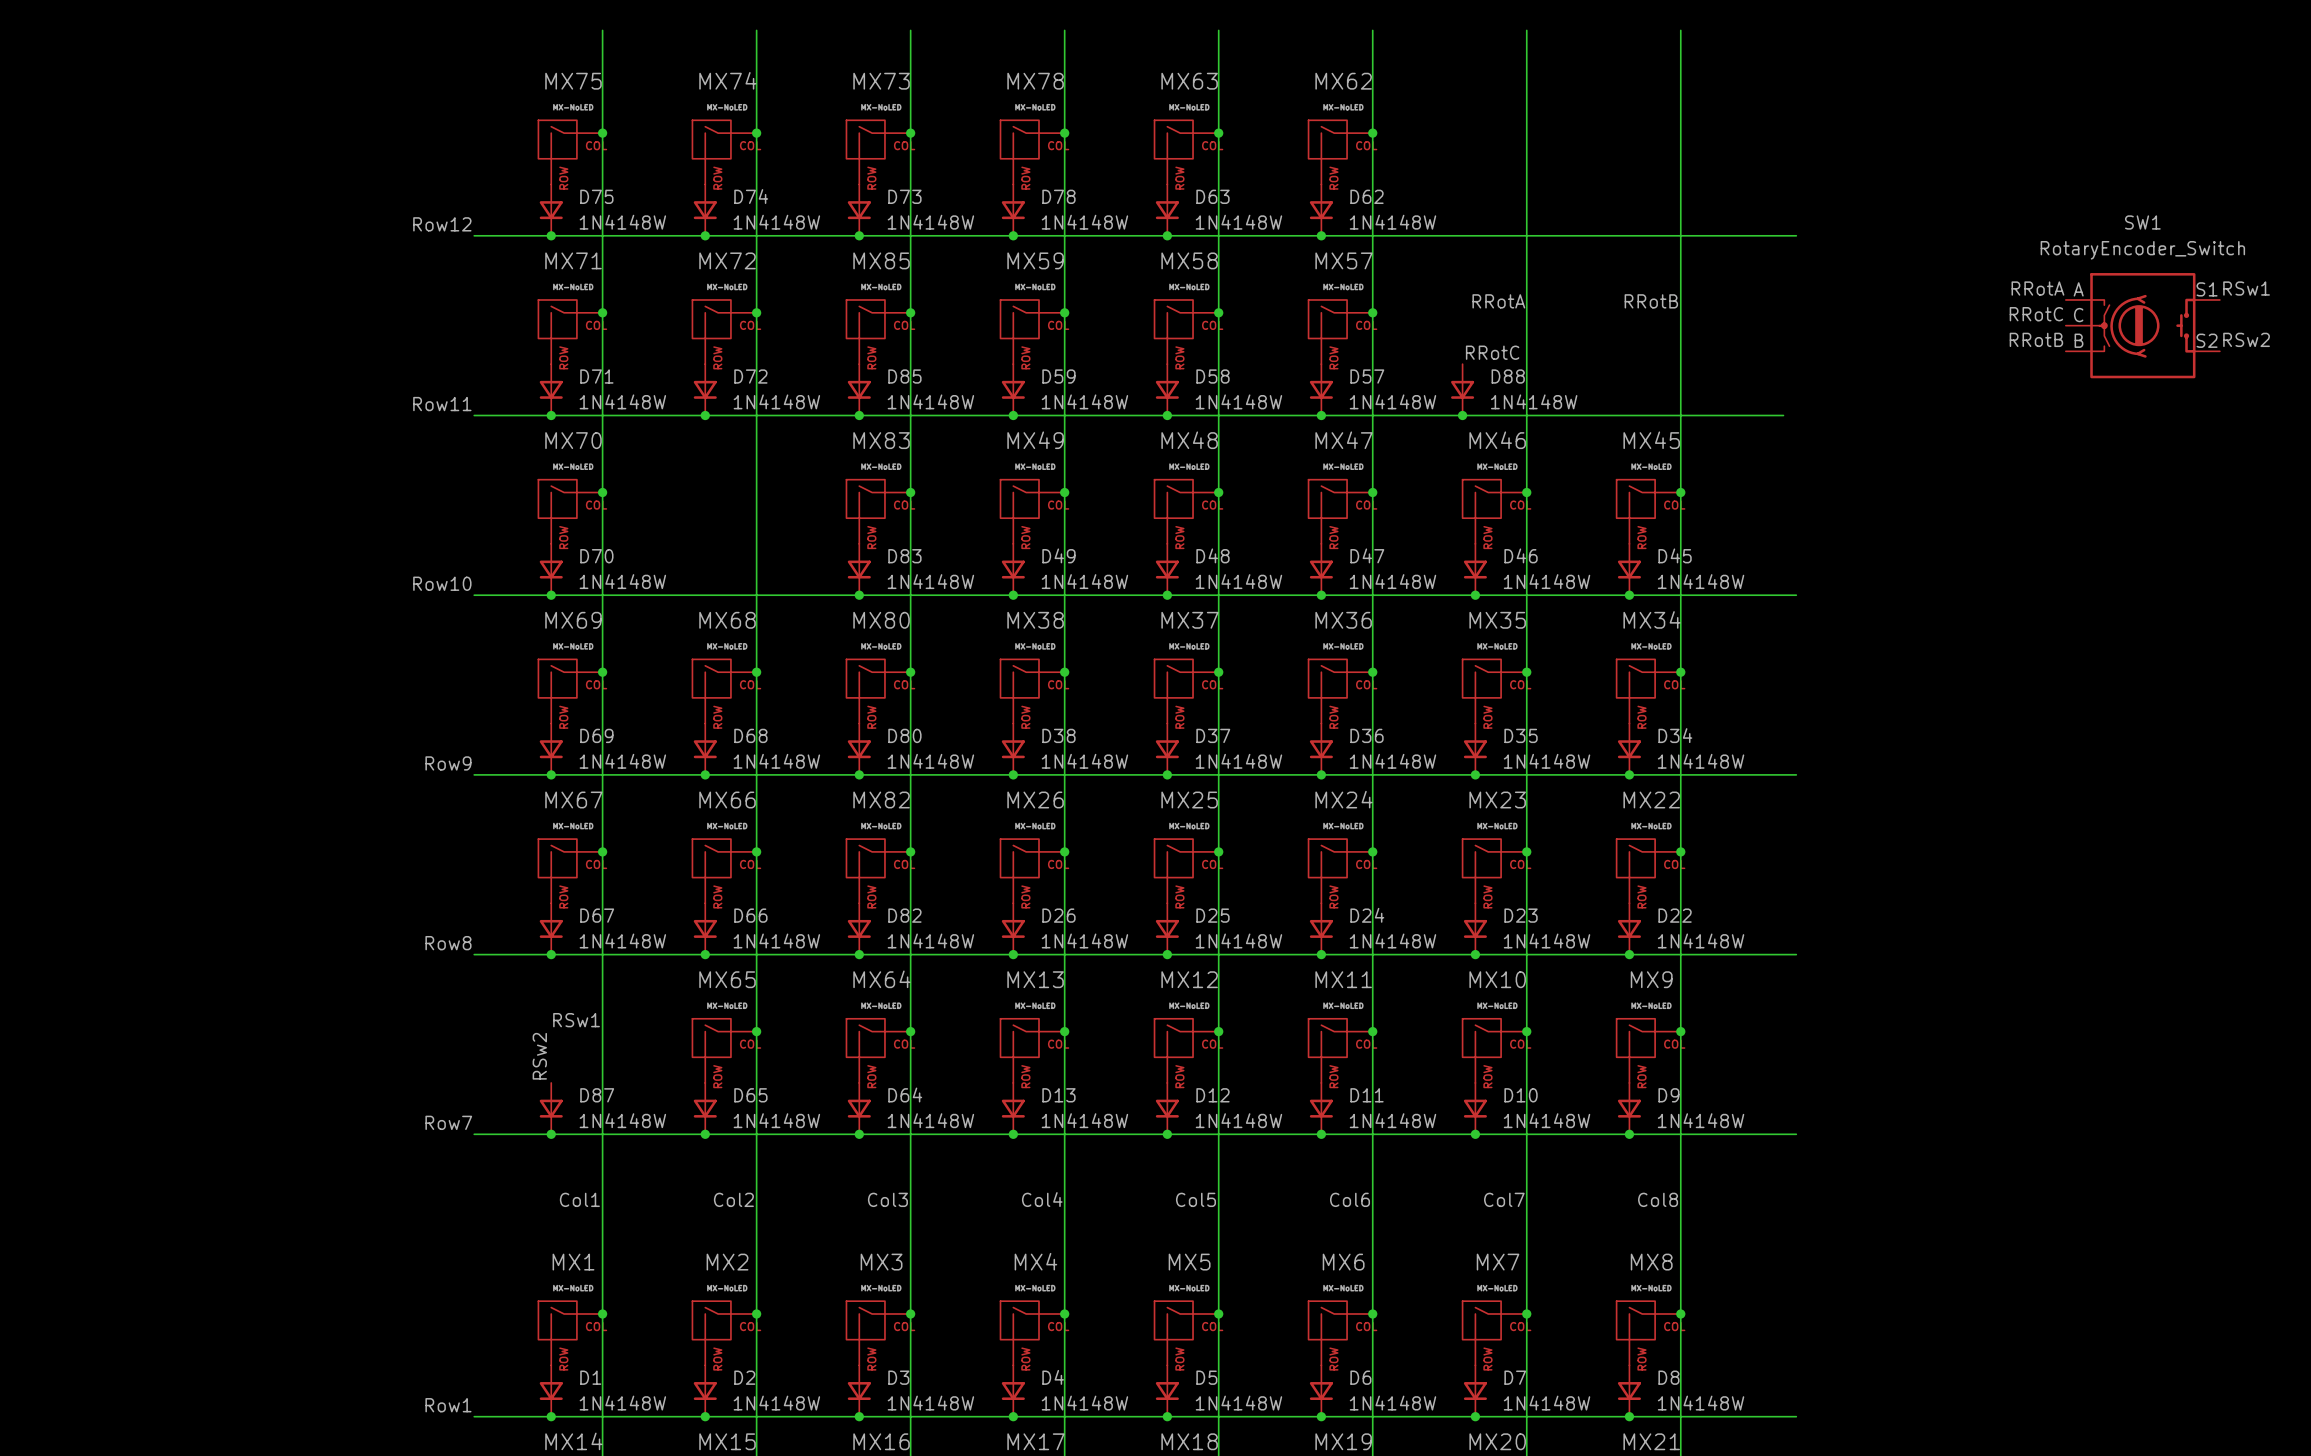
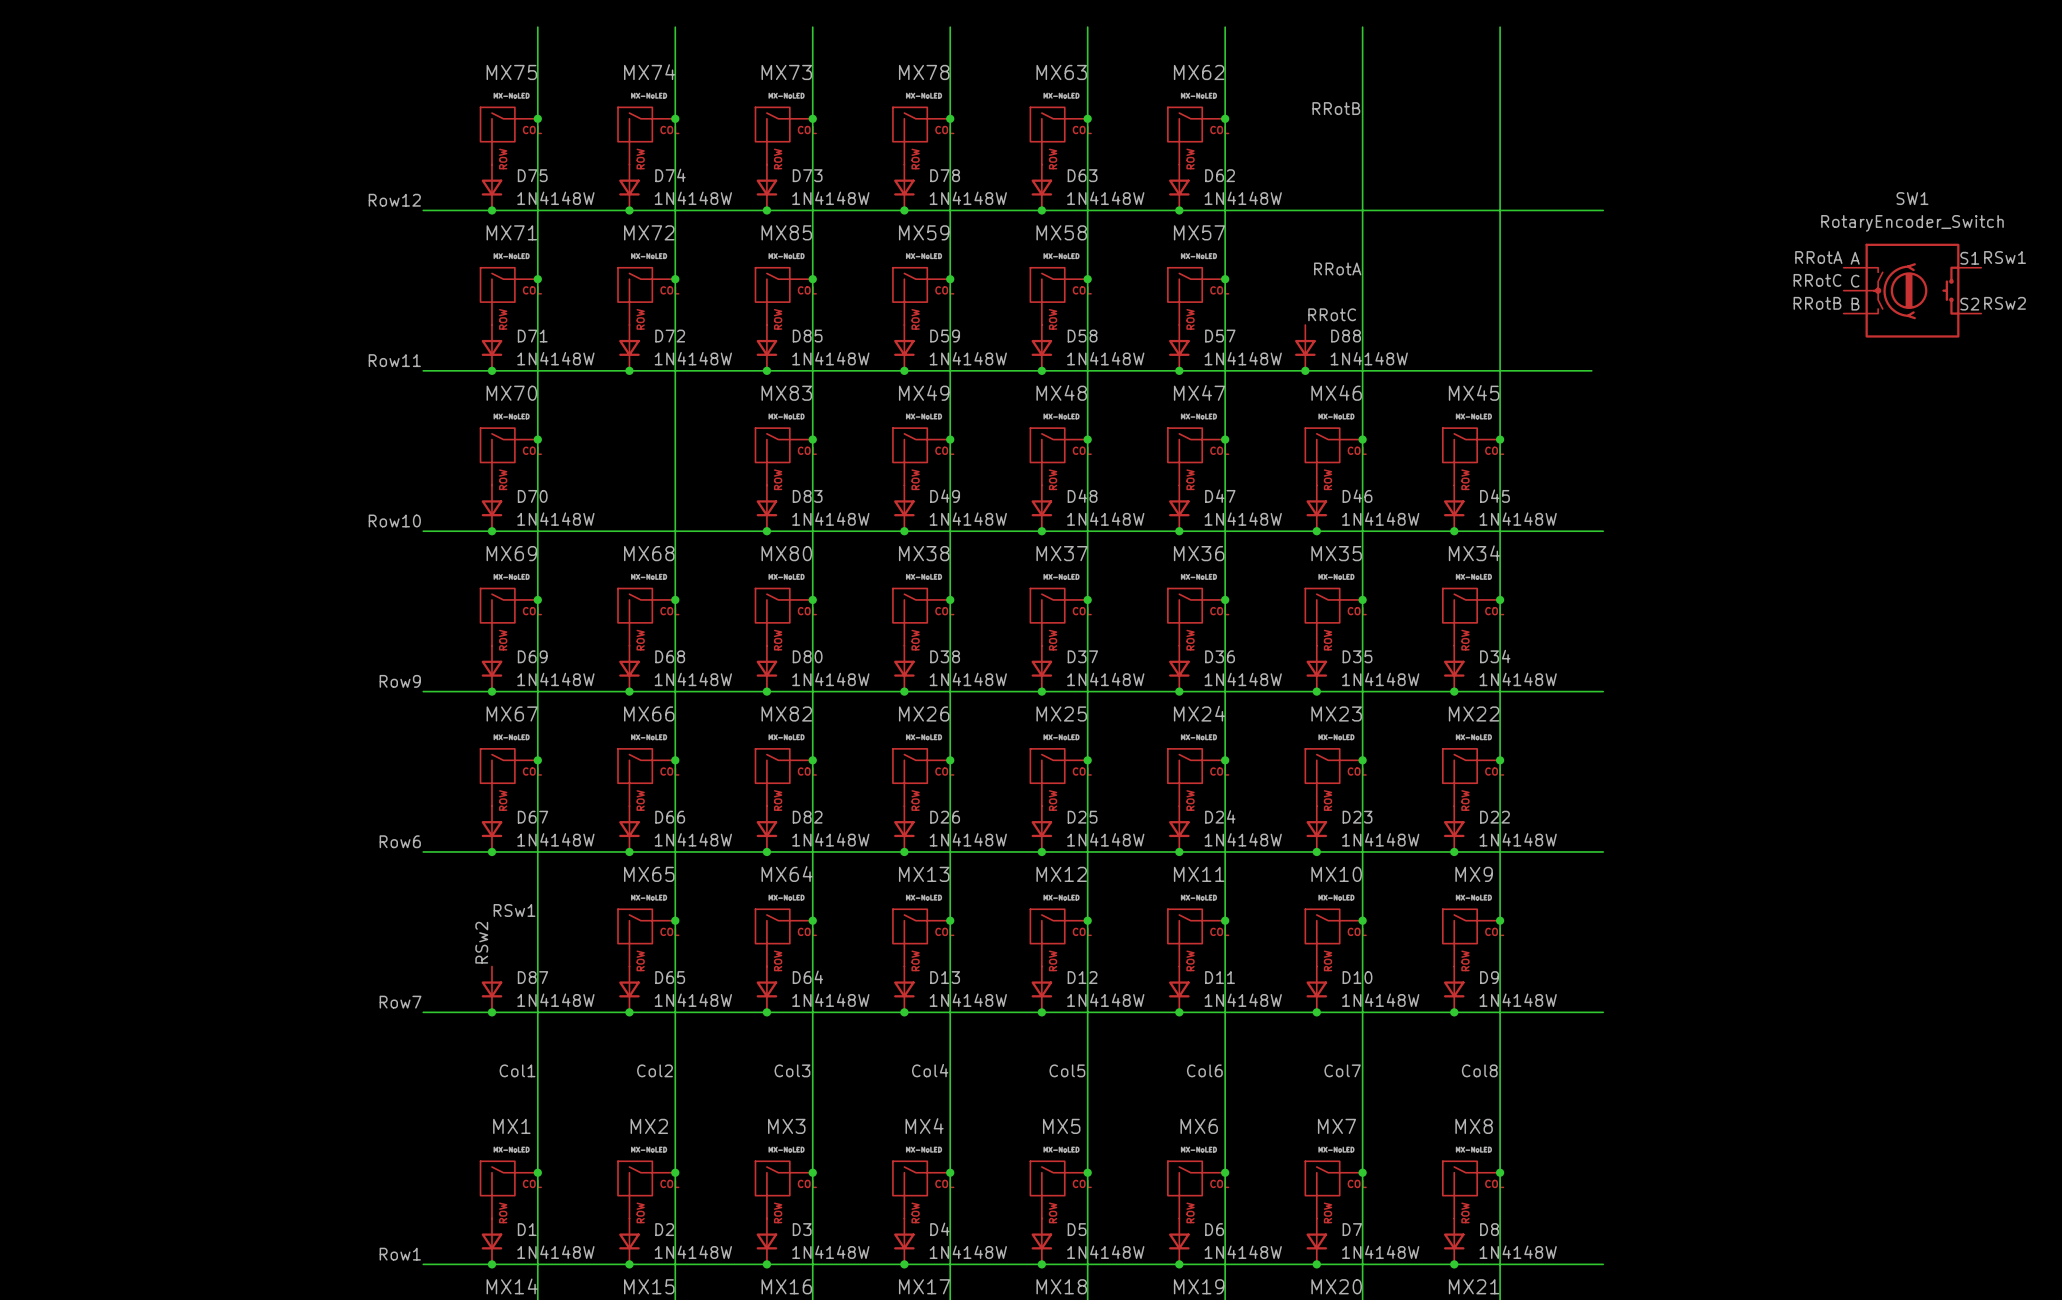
label position: RRotB (1651, 301) -> RRotB (1336, 108)
label: Row8 (448, 943) -> Row6 (400, 841)

